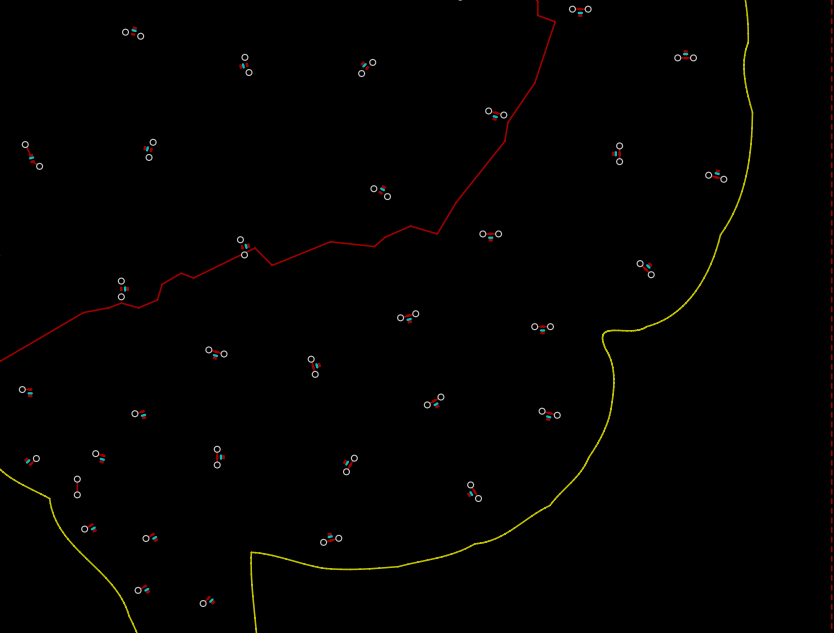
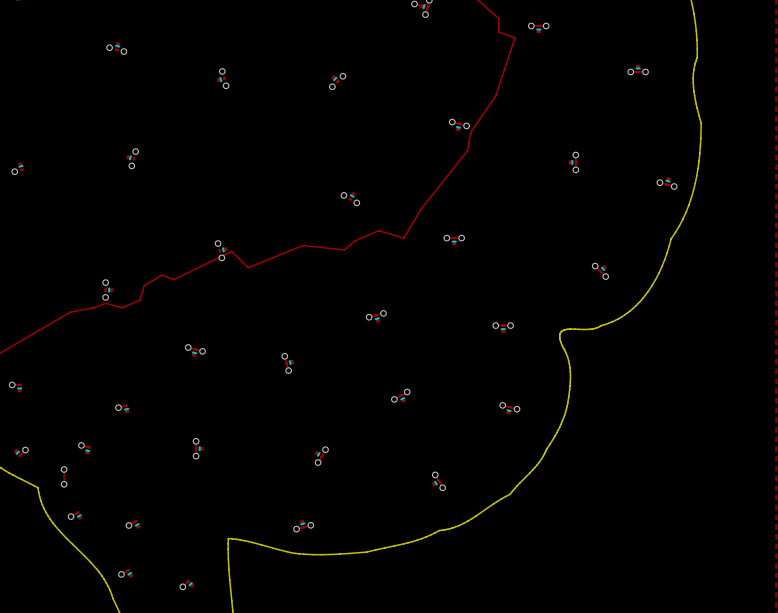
track: (25, 144) (30, 155) -> none
via: (25, 144) -> none
track: (32, 161) (39, 166) -> none
via: none -> (14, 171)
via: (39, 166) -> none

